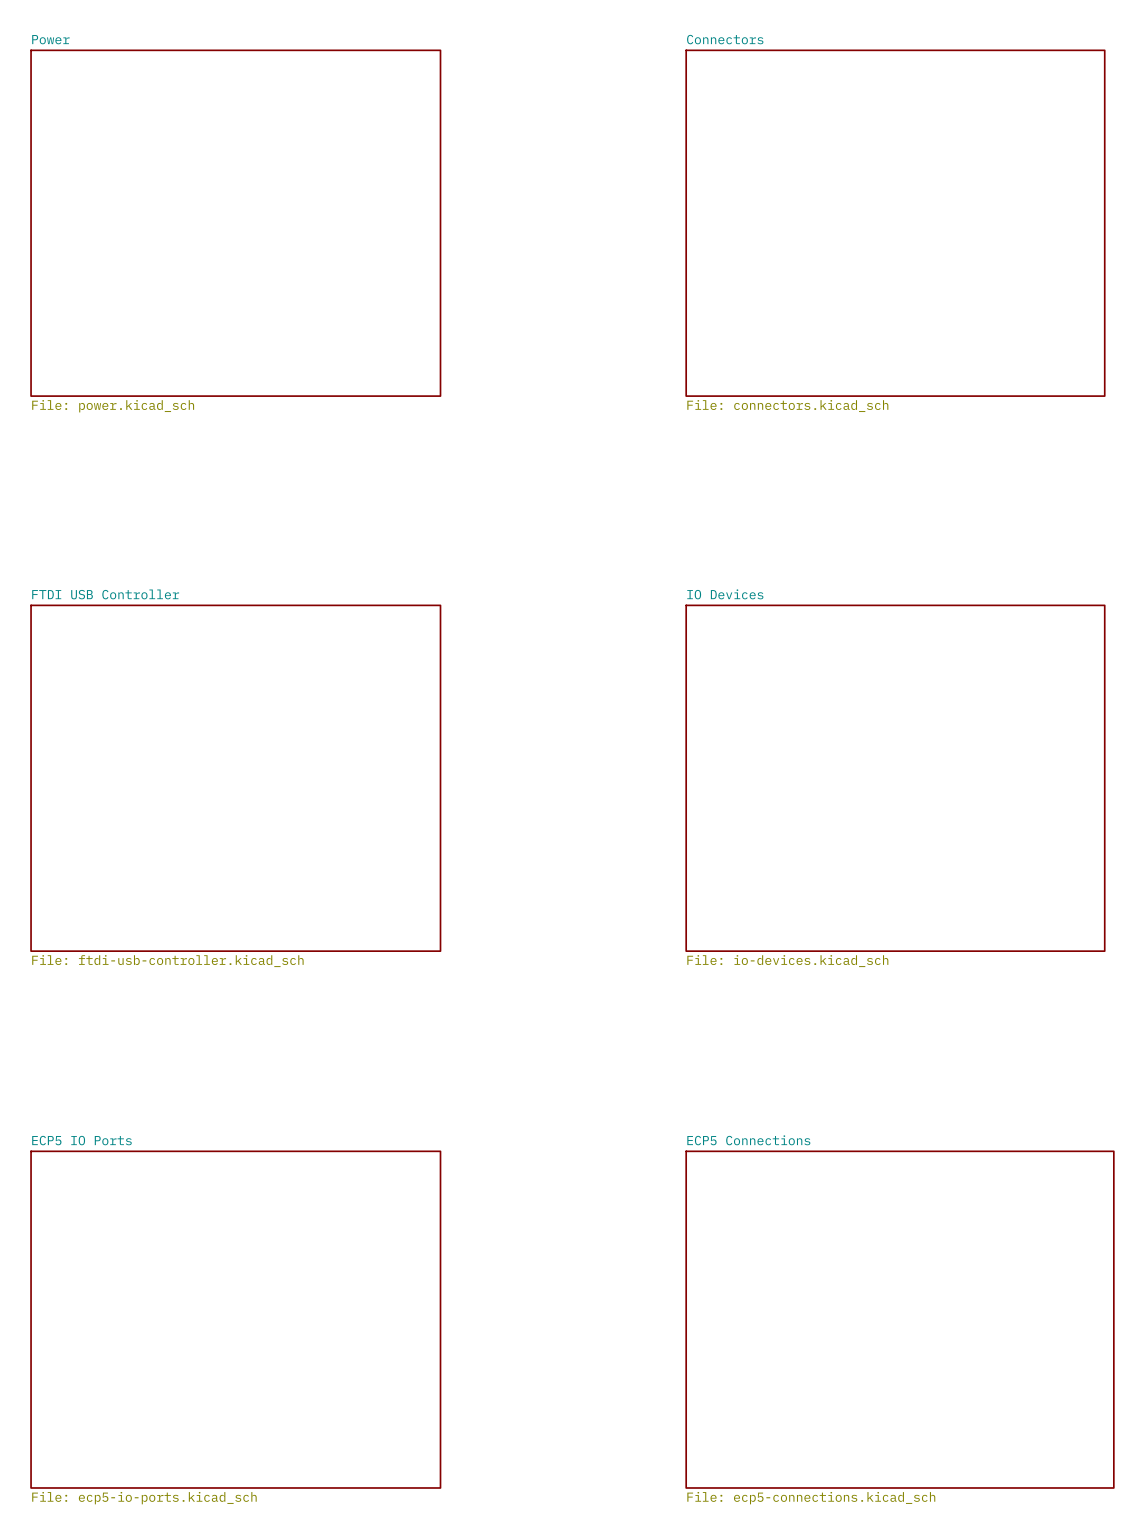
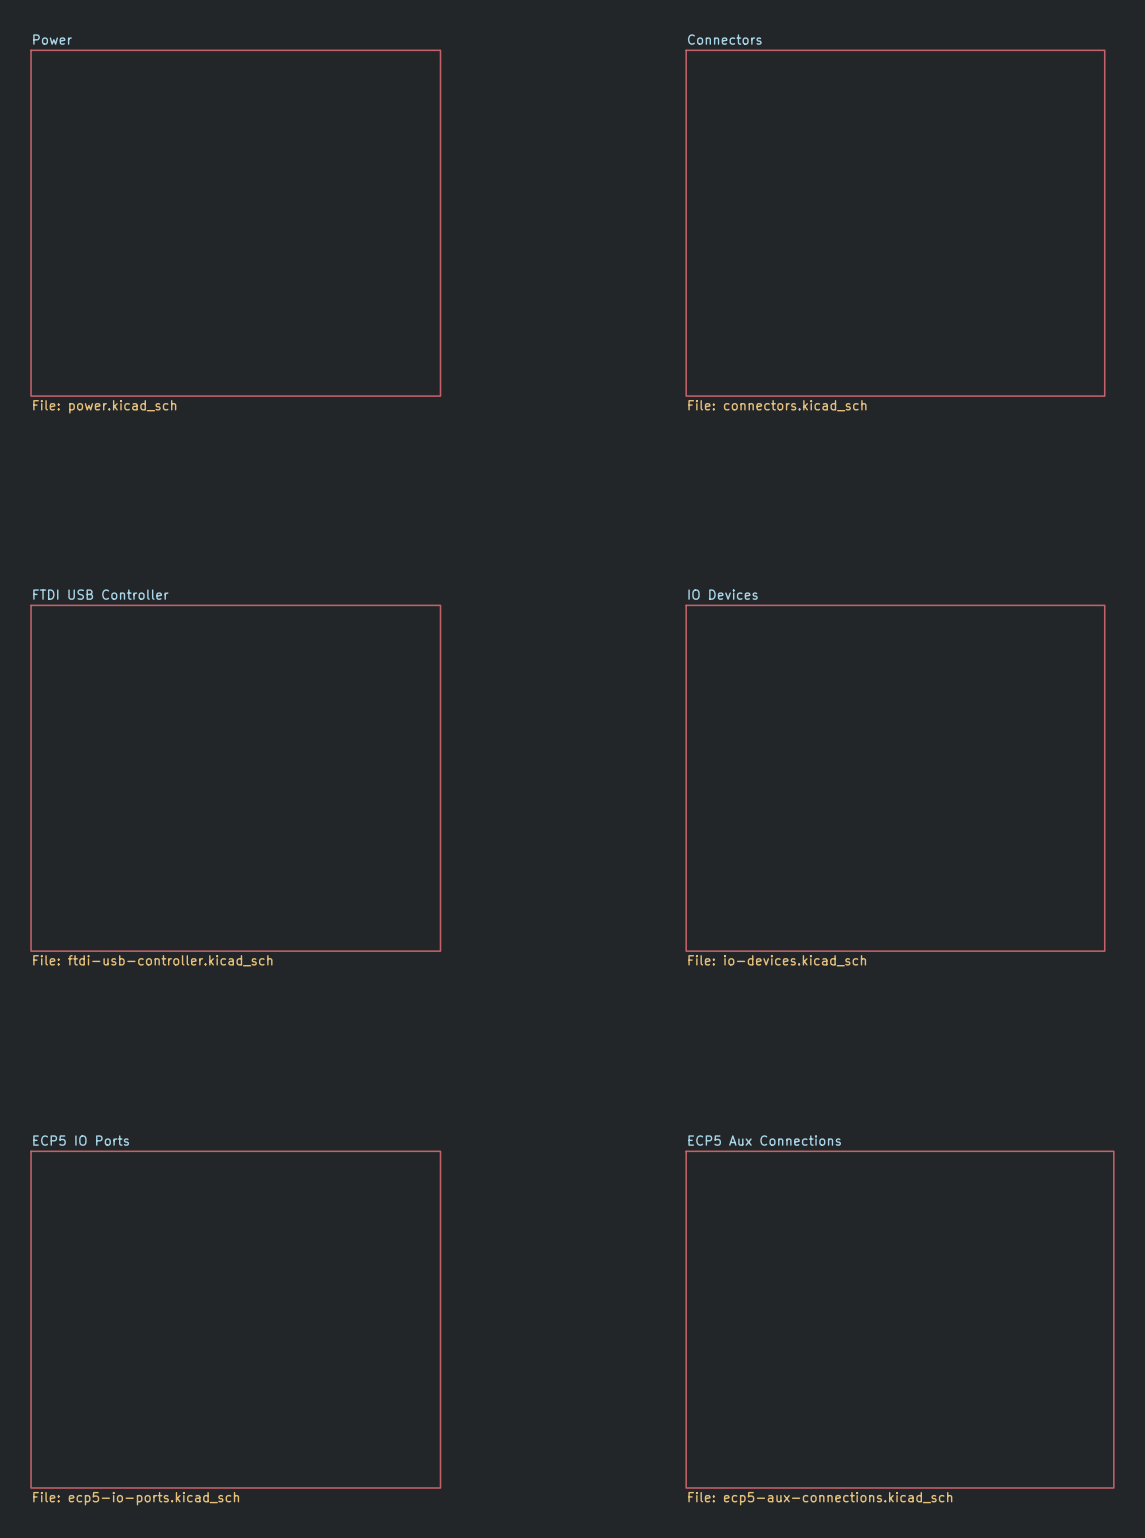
sheet ECP5 Connections name: ECP5 Connections (748, 1140) -> ECP5 Aux Connections (764, 1140)
sheet ECP5 Connections value: File: ecp5-connections.kicad_sch (811, 1498) -> File: ecp5-aux-connections.kicad_sch (820, 1498)

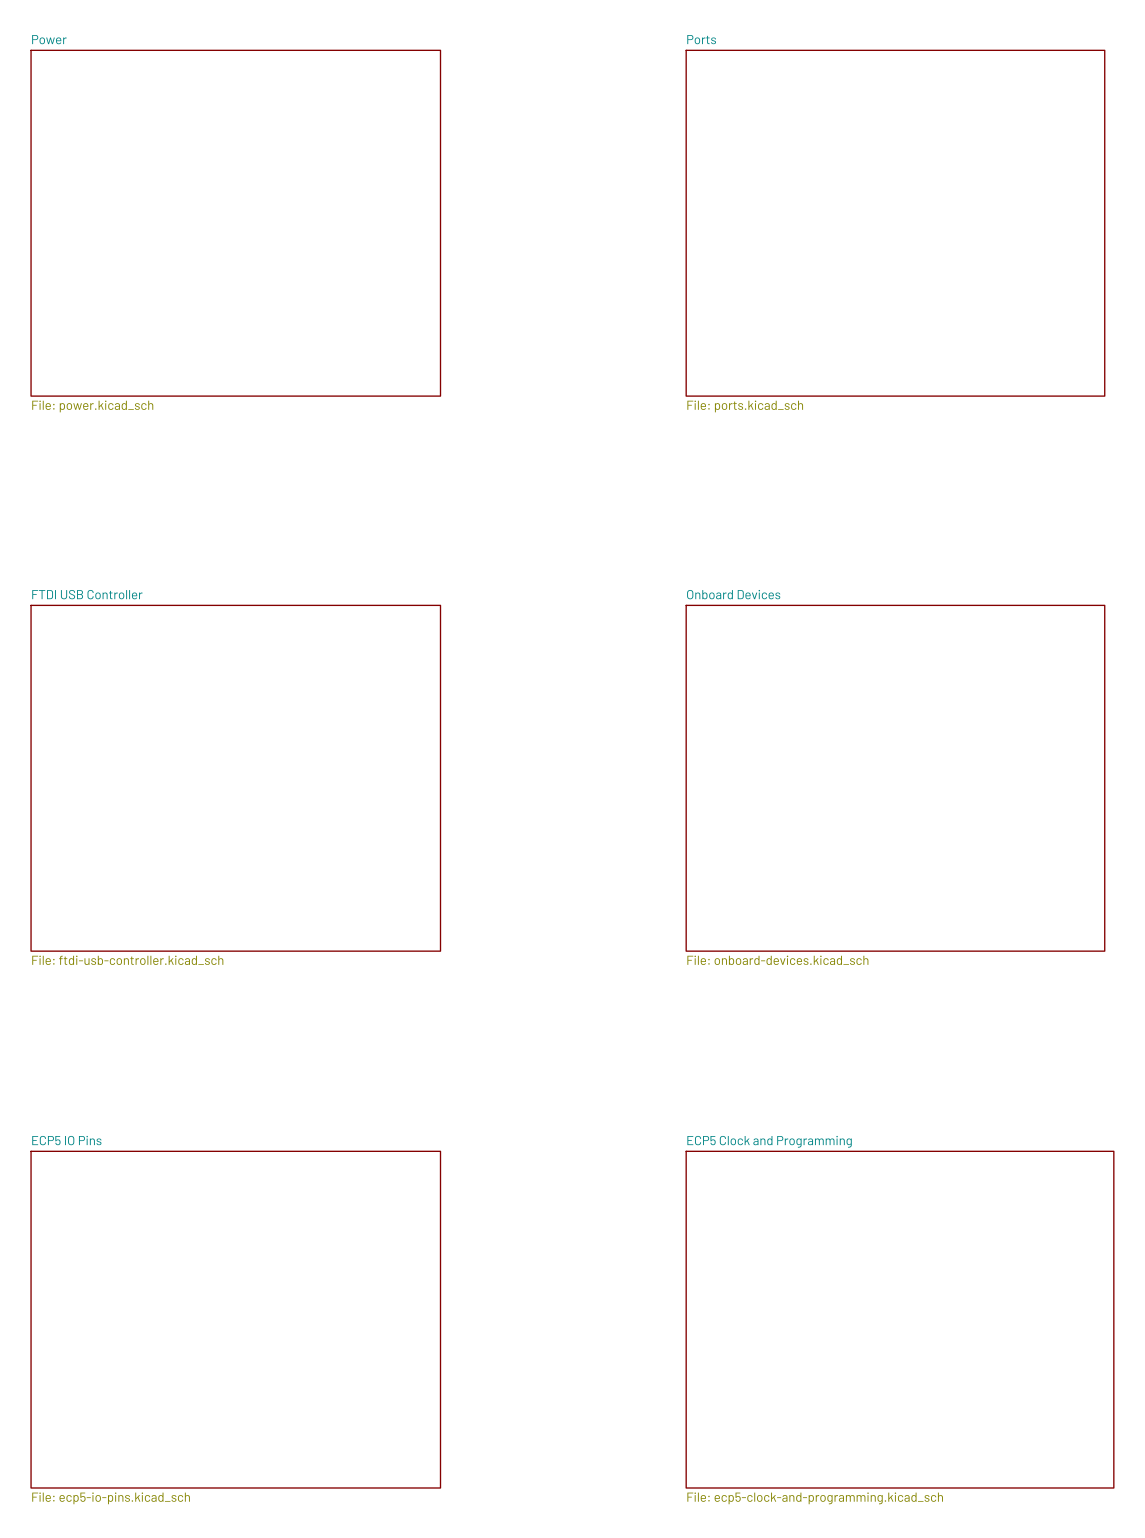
sheet Connectors name: Connectors (724, 39) -> Ports (701, 39)
sheet Connectors value: File: connectors.kicad_sch (777, 405) -> File: ports.kicad_sch (745, 406)
sheet IO Devices name: IO Devices (723, 594) -> Onboard Devices (733, 594)
sheet IO Devices value: File: io-devices.kicad_sch (777, 960) -> File: onboard-devices.kicad_sch (777, 960)
sheet ECP5 IO Ports name: ECP5 IO Ports (81, 1140) -> ECP5 IO Pins (66, 1140)
sheet ECP5 Aux Connections name: ECP5 Aux Connections (764, 1140) -> ECP5 Clock and Programming (769, 1141)
sheet ECP5 IO Ports value: File: ecp5-io-ports.kicad_sch (136, 1498) -> File: ecp5-io-pins.kicad_sch (111, 1498)
sheet ECP5 Aux Connections value: File: ecp5-aux-connections.kicad_sch (820, 1498) -> File: ecp5-clock-and-programming.kicad_sch (815, 1498)

